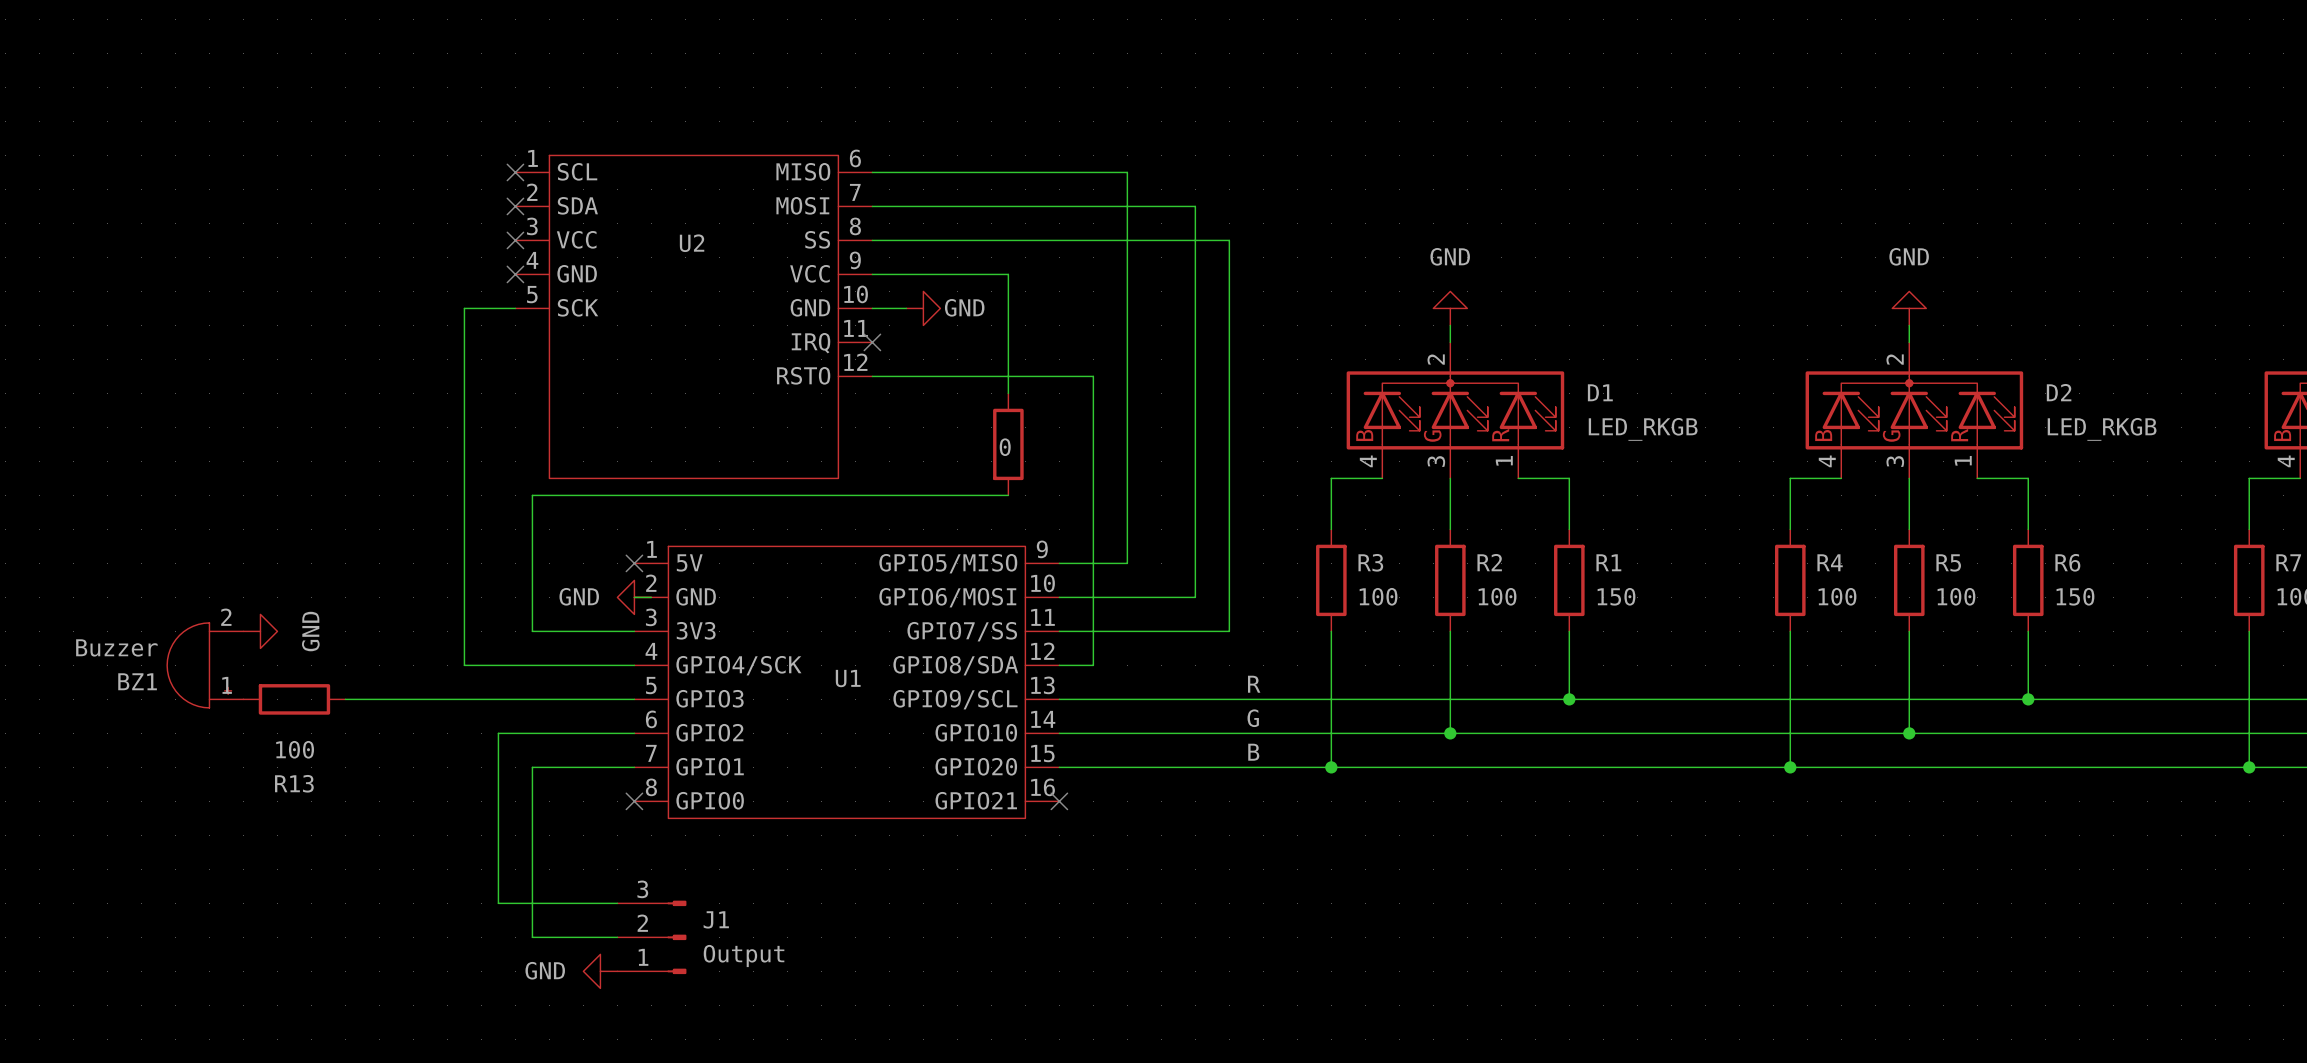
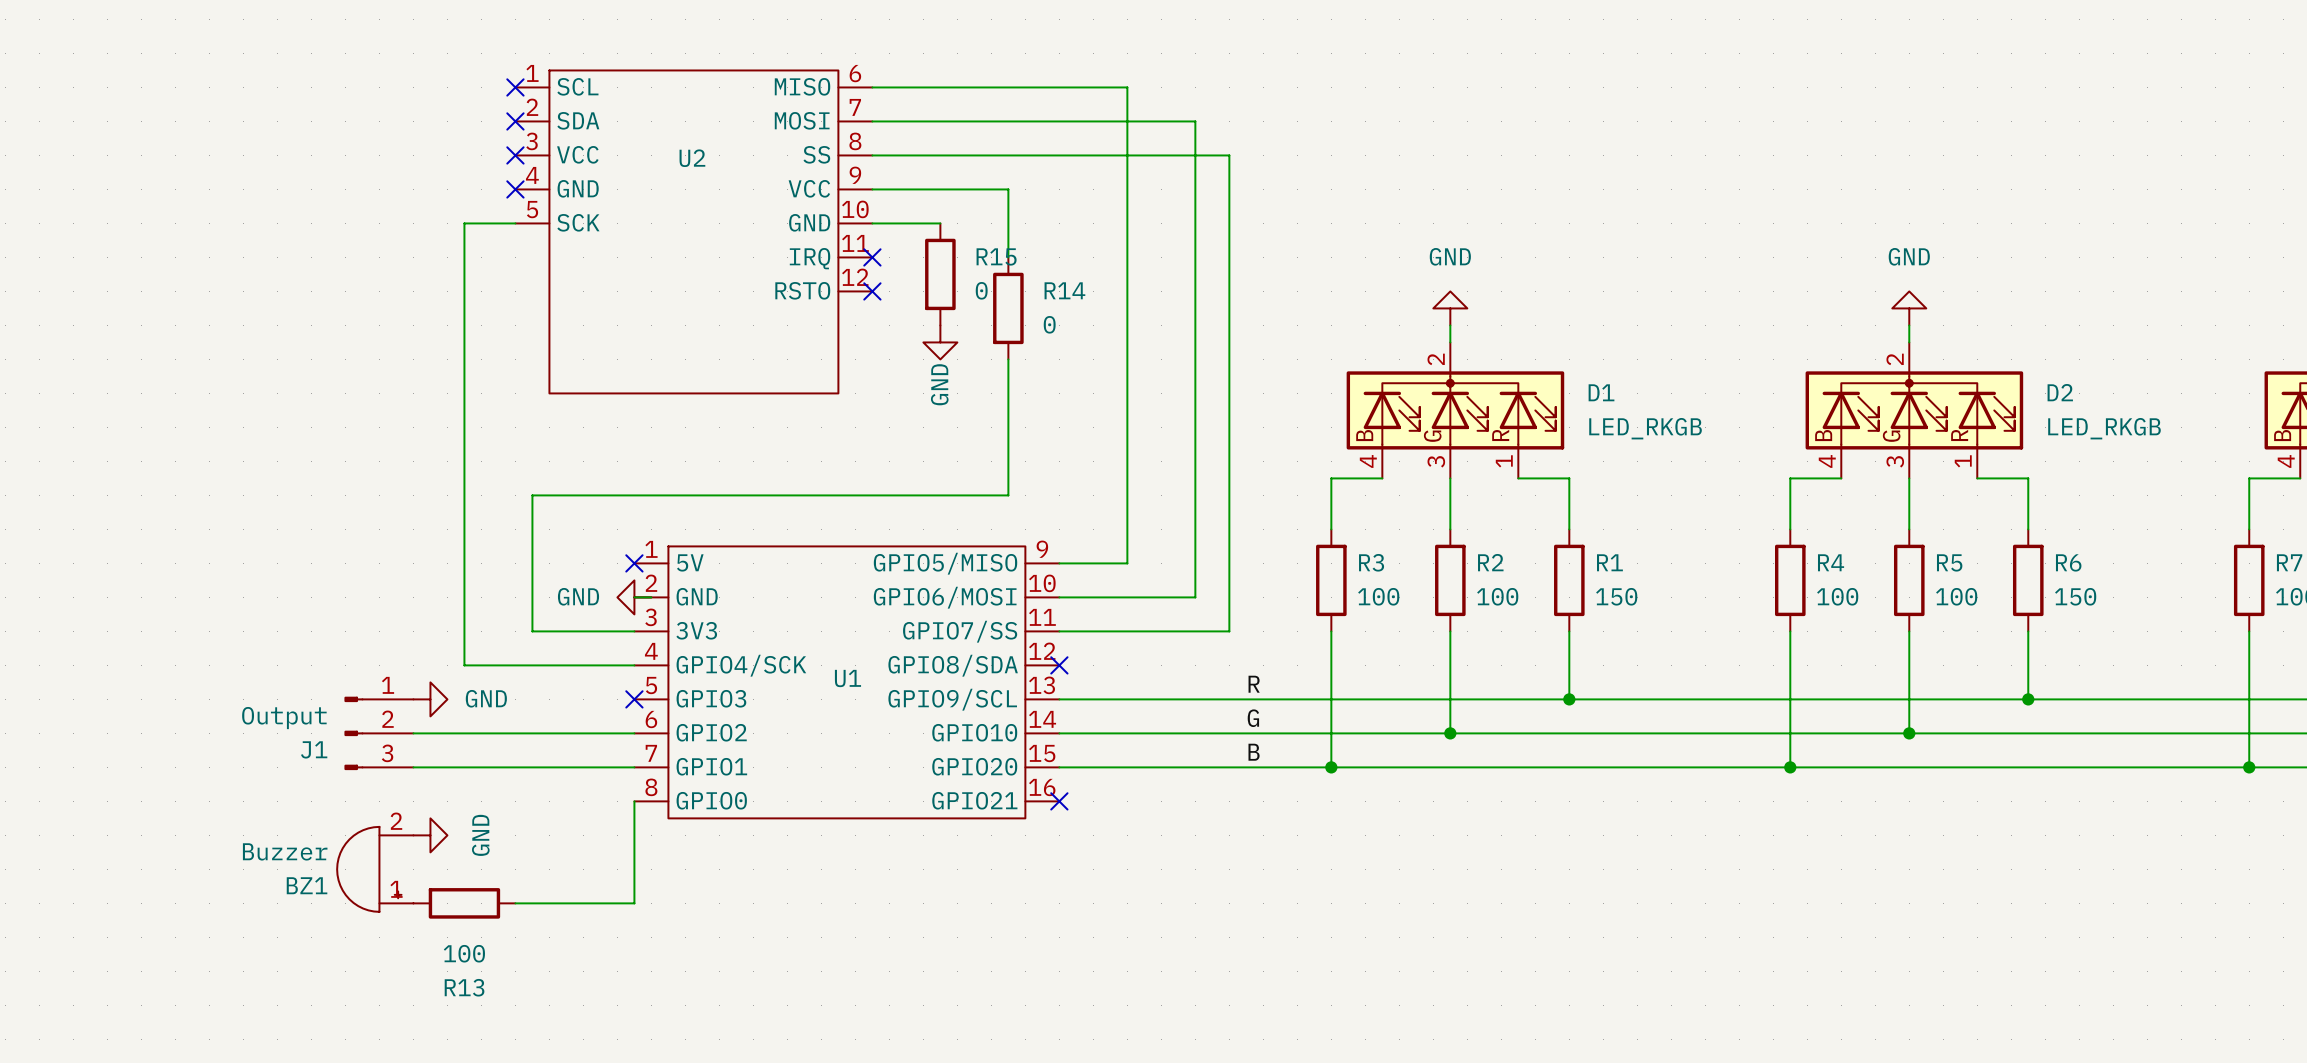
no-connect mark: none -> (515, 87)
no-connect mark: none -> (515, 121)
no-connect mark: none -> (515, 155)
no-connect mark: (515, 172) -> none
wire: (872, 172) (1127, 172) -> (872, 87) (1127, 87) (1127, 172)
no-connect mark: none -> (515, 189)
wire: none -> (872, 189) (1008, 189) (1008, 257)
no-connect mark: (515, 206) -> none
wire: (872, 206) (1195, 206) -> (872, 121) (1195, 121) (1195, 206)
wire: none -> (872, 223) (940, 223)
no-connect mark: (515, 240) -> none
wire: (872, 240) (1229, 240) -> (872, 155) (1229, 155) (1229, 240)
no-connect mark: none -> (872, 257)
no-connect mark: (515, 274) -> none
wire: (872, 274) (1008, 274) (1008, 359) -> none
R15: none -> 0 (940, 274)
no-connect mark: none -> (872, 291)
wire: (464, 308) (515, 308) -> (464, 308) (464, 223) (515, 223)
wire: (872, 308) (906, 308) -> none
power symbol rotation: 0° (923, 308) -> 90° clockwise (940, 342)
power symbol position: GND (923, 308) -> GND (940, 342)
R14: none -> 0 (1008, 308)
U2 position: (693, 316) -> (693, 231)
no-connect mark: (872, 342) -> none
wire: (872, 376) (1093, 376) (1093, 665) (1059, 665) -> none
wire: none -> (1008, 393) (1008, 495)
part: 0 (1008, 444) -> none
power symbol: GND (260, 631) -> none
BZ1 position: (205, 665) -> (375, 869)
no-connect mark: none -> (1059, 665)
R13 position: (294, 699) -> (464, 903)
wire: (345, 699) (634, 699) -> none
power symbol: none -> GND (430, 699)
no-connect mark: none -> (634, 699)
wire: (498, 733) (498, 903) (515, 903) -> (498, 733) (413, 733)
wire: (532, 767) (532, 937) (617, 937) -> (532, 767) (413, 767)
wire: none -> (634, 801) (634, 903) (617, 903)
no-connect mark: (634, 801) -> none
power symbol: none -> GND (430, 835)
J1 position: (651, 937) -> (378, 733)
J1 rotation: 0° (676, 937) -> 180° (353, 733)
power symbol: GND (600, 971) -> none

